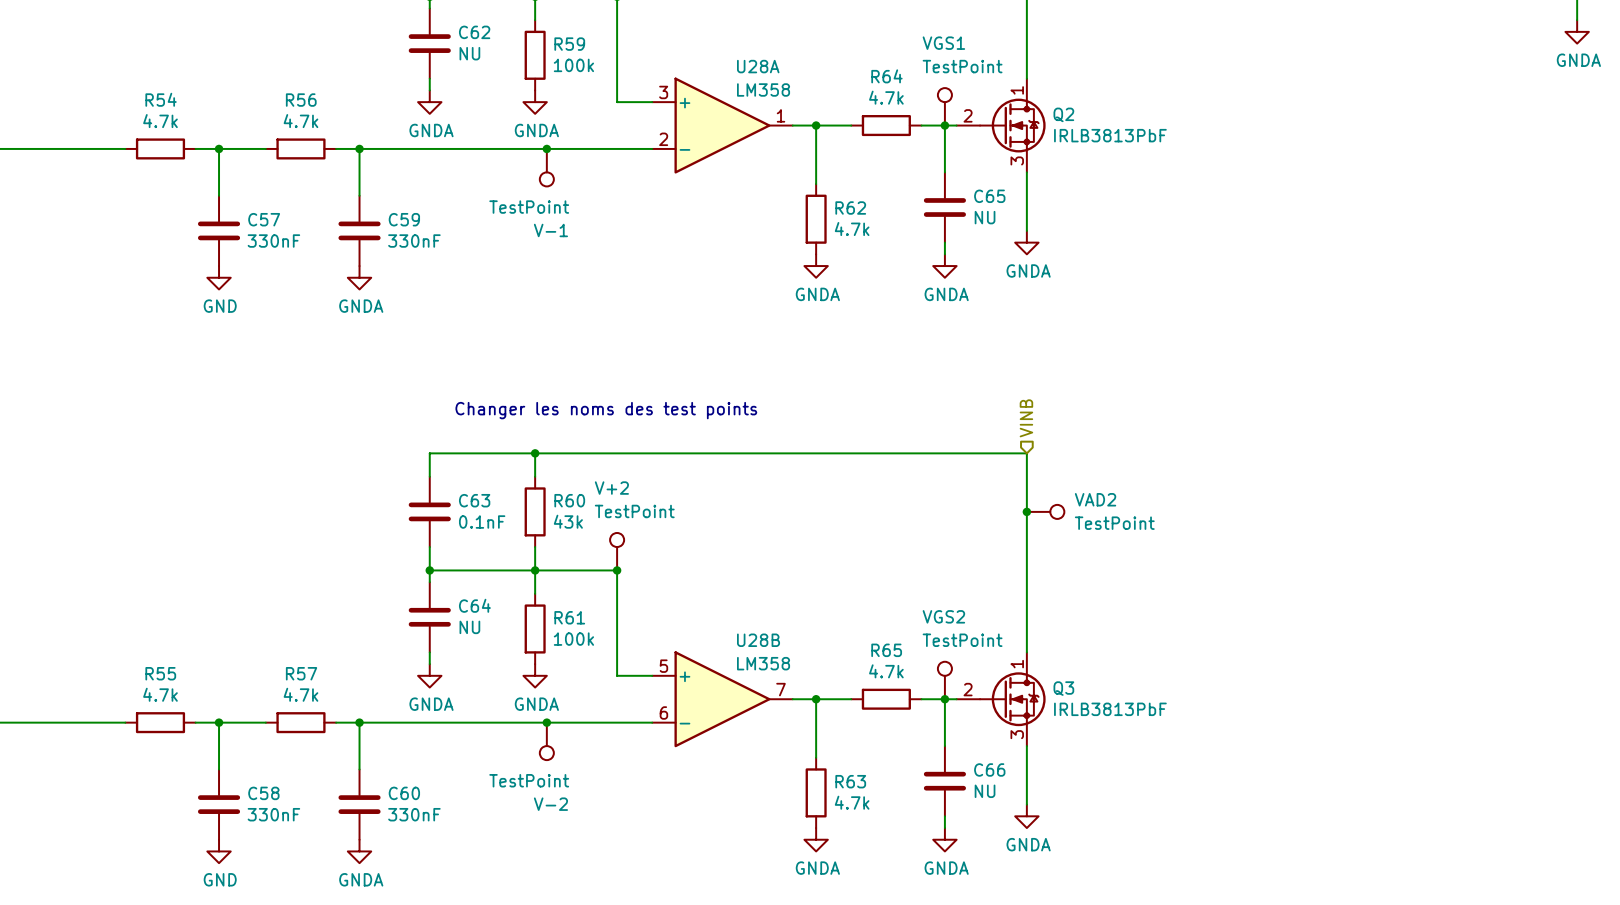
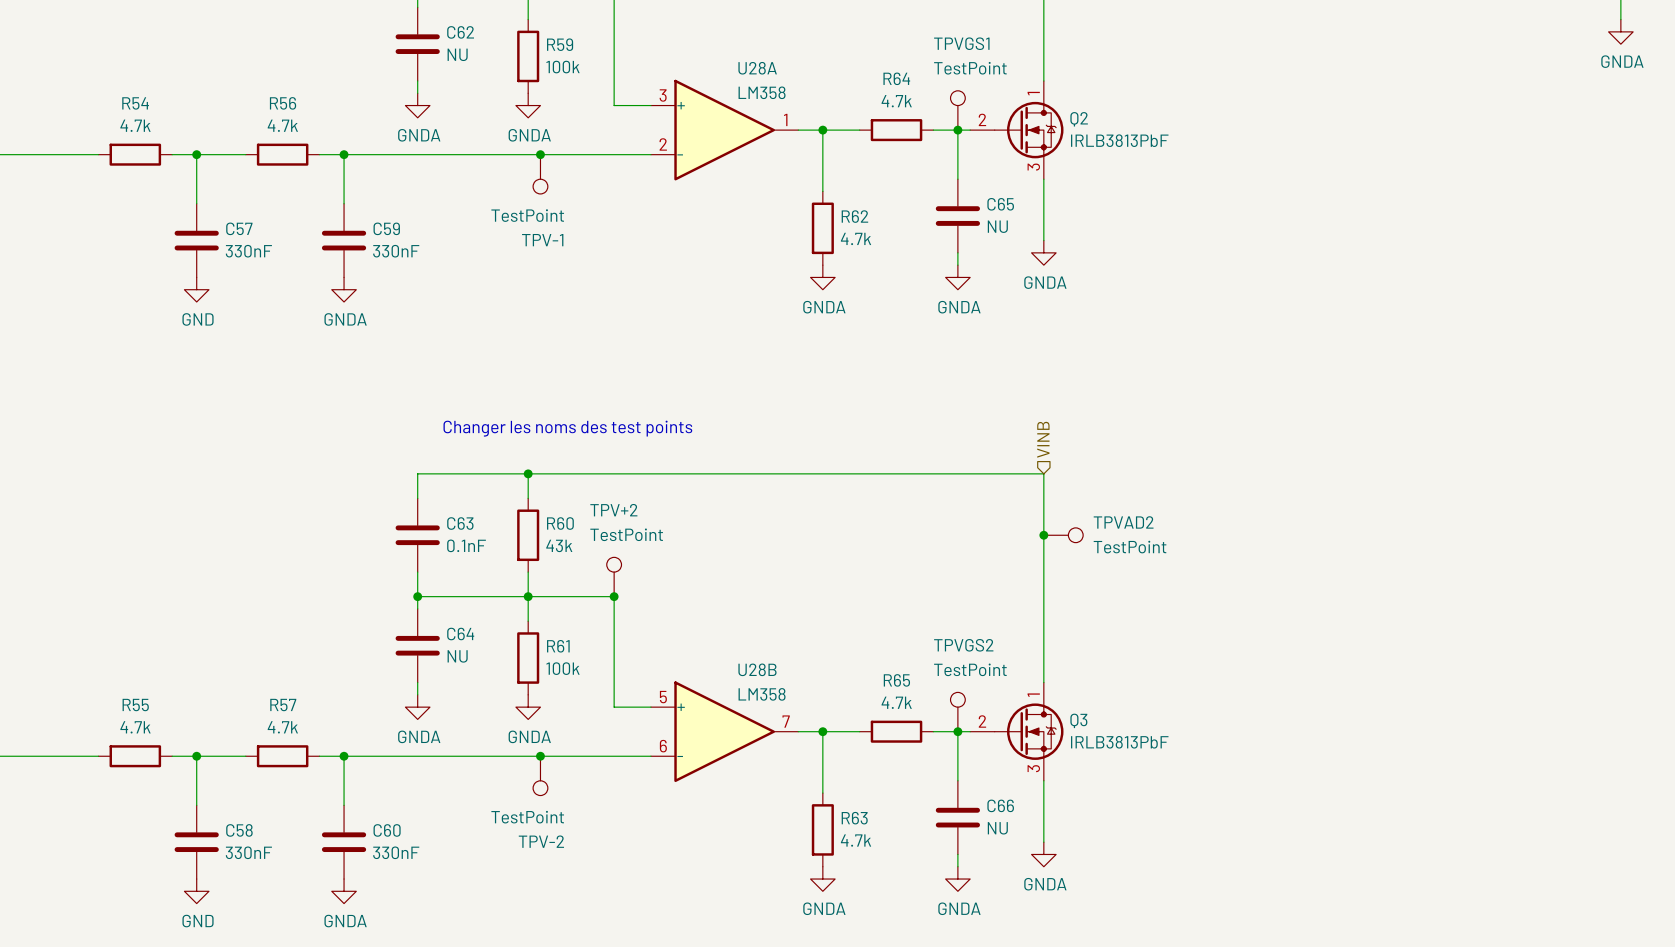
VGS1 name: VGS1 (943, 43) -> TPVGS1 (961, 43)
V-1 name: V-1 (550, 230) -> TPV-1 (542, 240)
V+2 name: V+2 (611, 488) -> TPV+2 (613, 510)
VAD2 name: VAD2 (1095, 499) -> TPVAD2 (1123, 522)
VGS2 name: VGS2 (943, 616) -> TPVGS2 (963, 645)
V-2 name: V-2 (550, 804) -> TPV-2 (541, 841)

